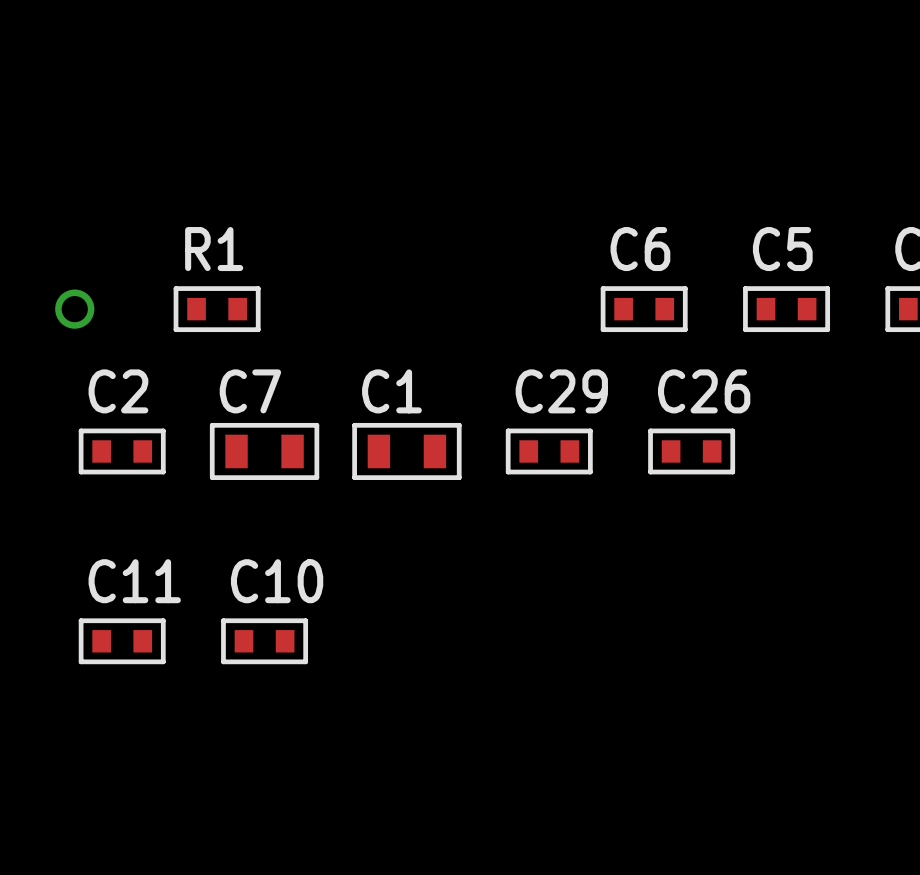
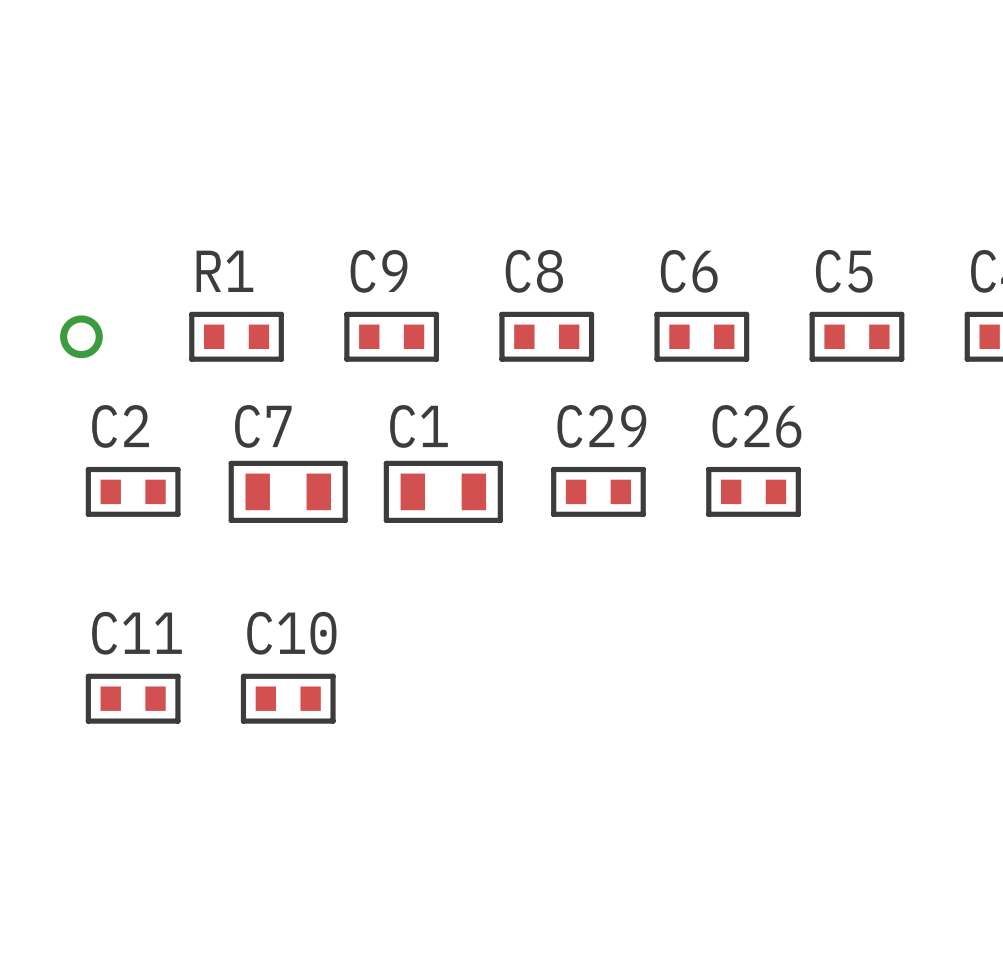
C9: none -> (391, 336)
C8: none -> (546, 336)

